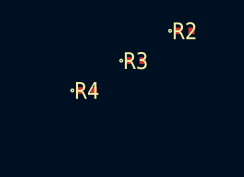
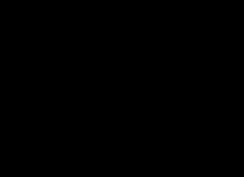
R2: (181, 30) -> none
R3: (132, 60) -> none
R4: (83, 90) -> none

